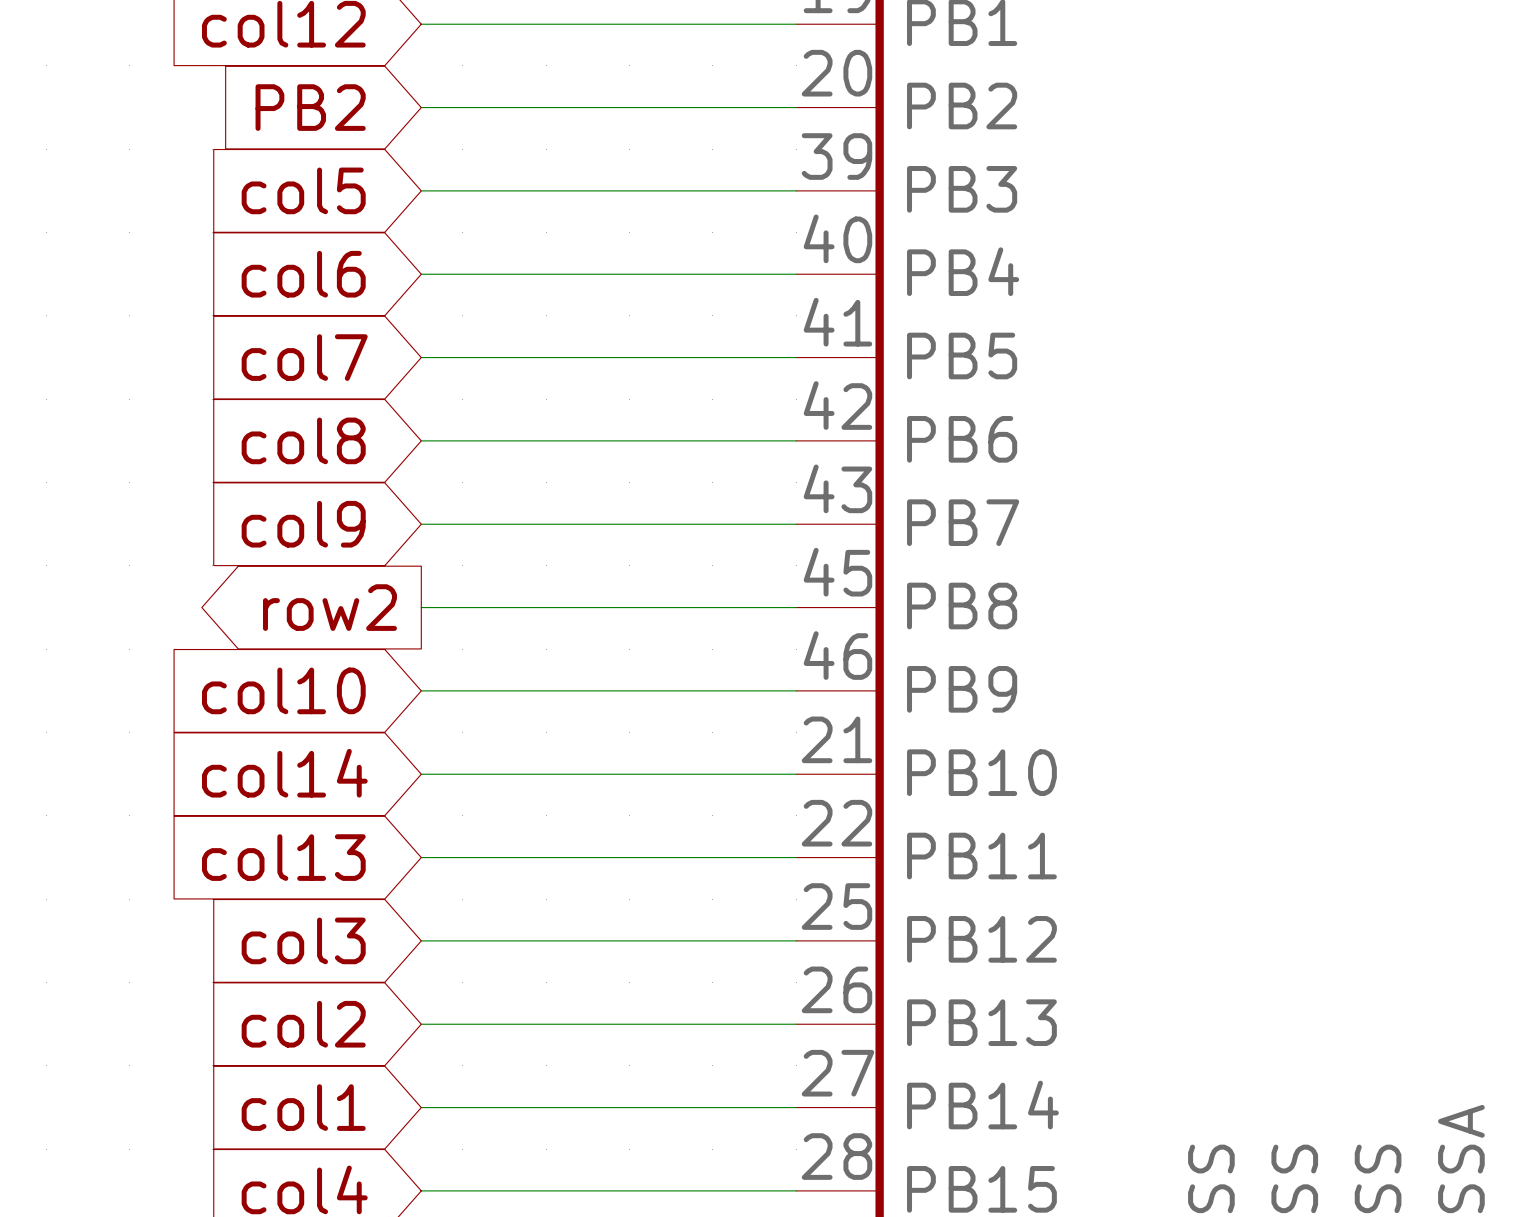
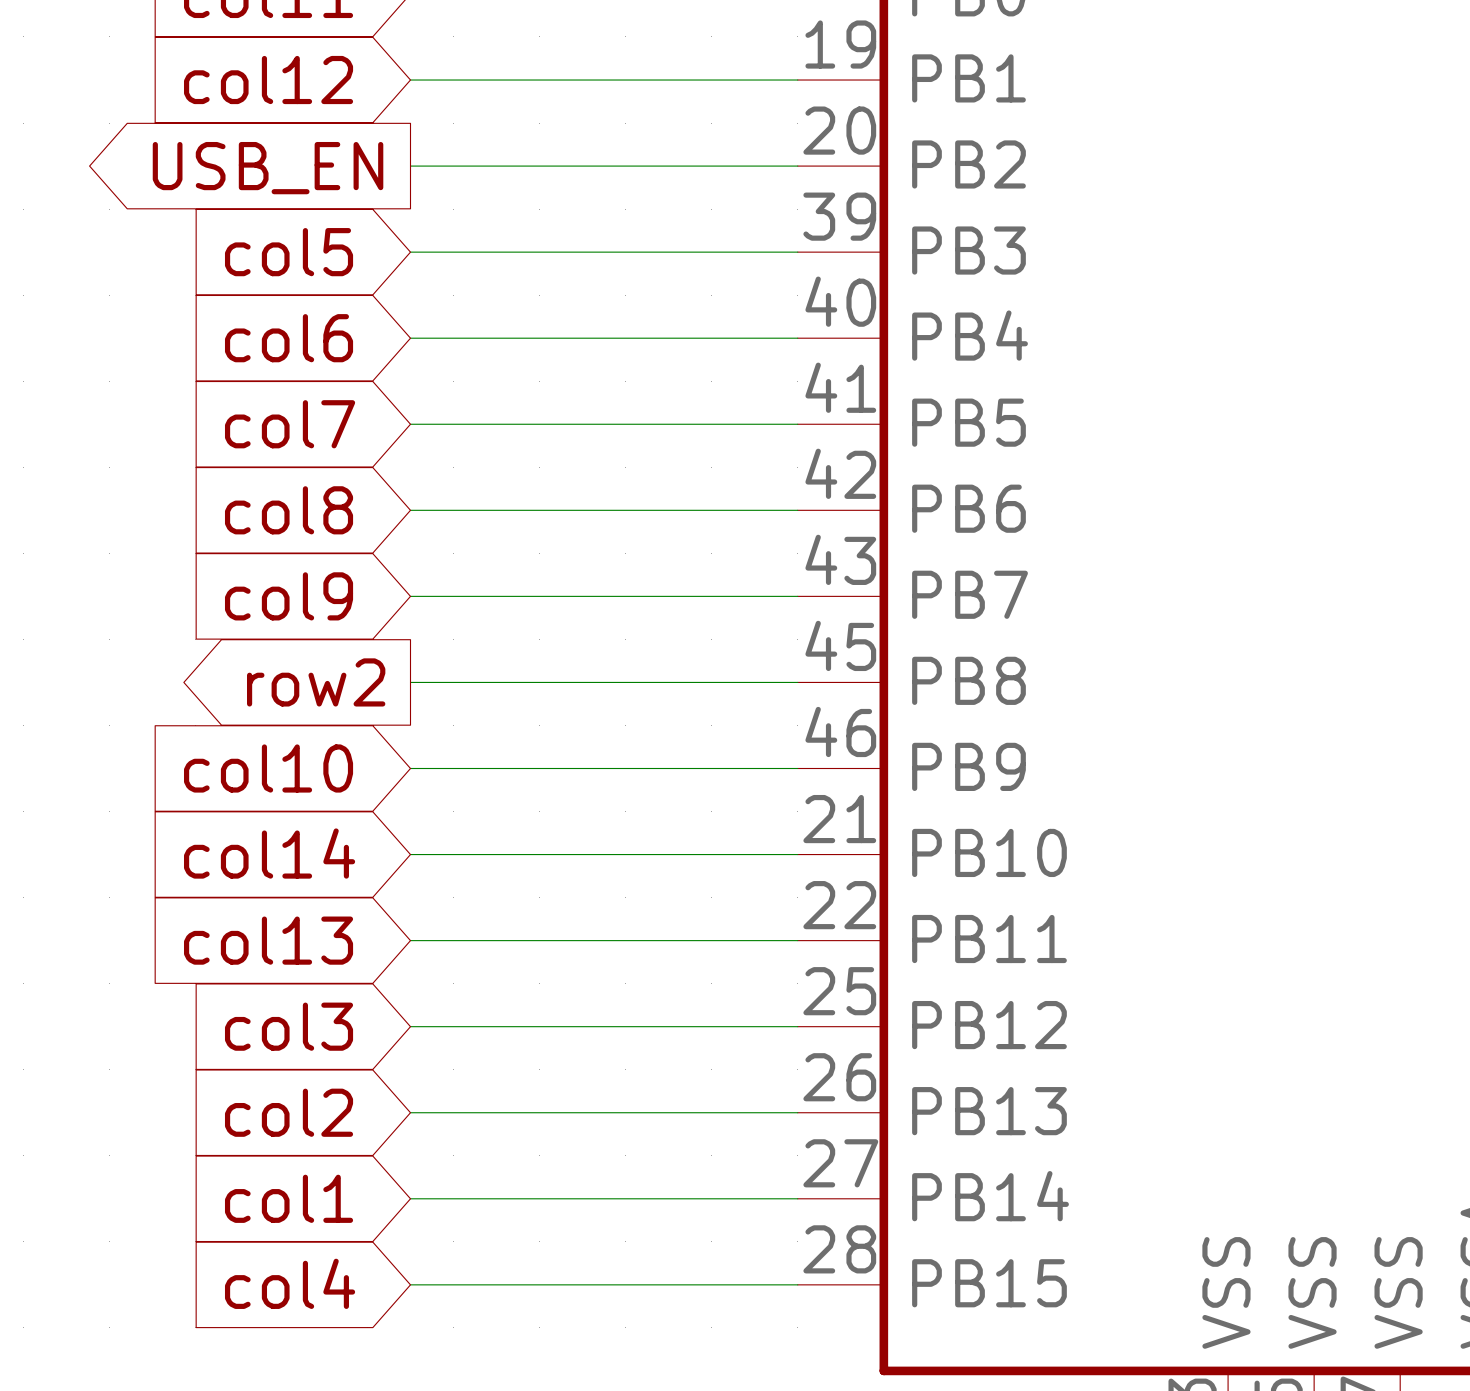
global label shape: input (310, 107) -> output (268, 168)
global label: PB2 (310, 107) -> USB_EN (268, 168)

